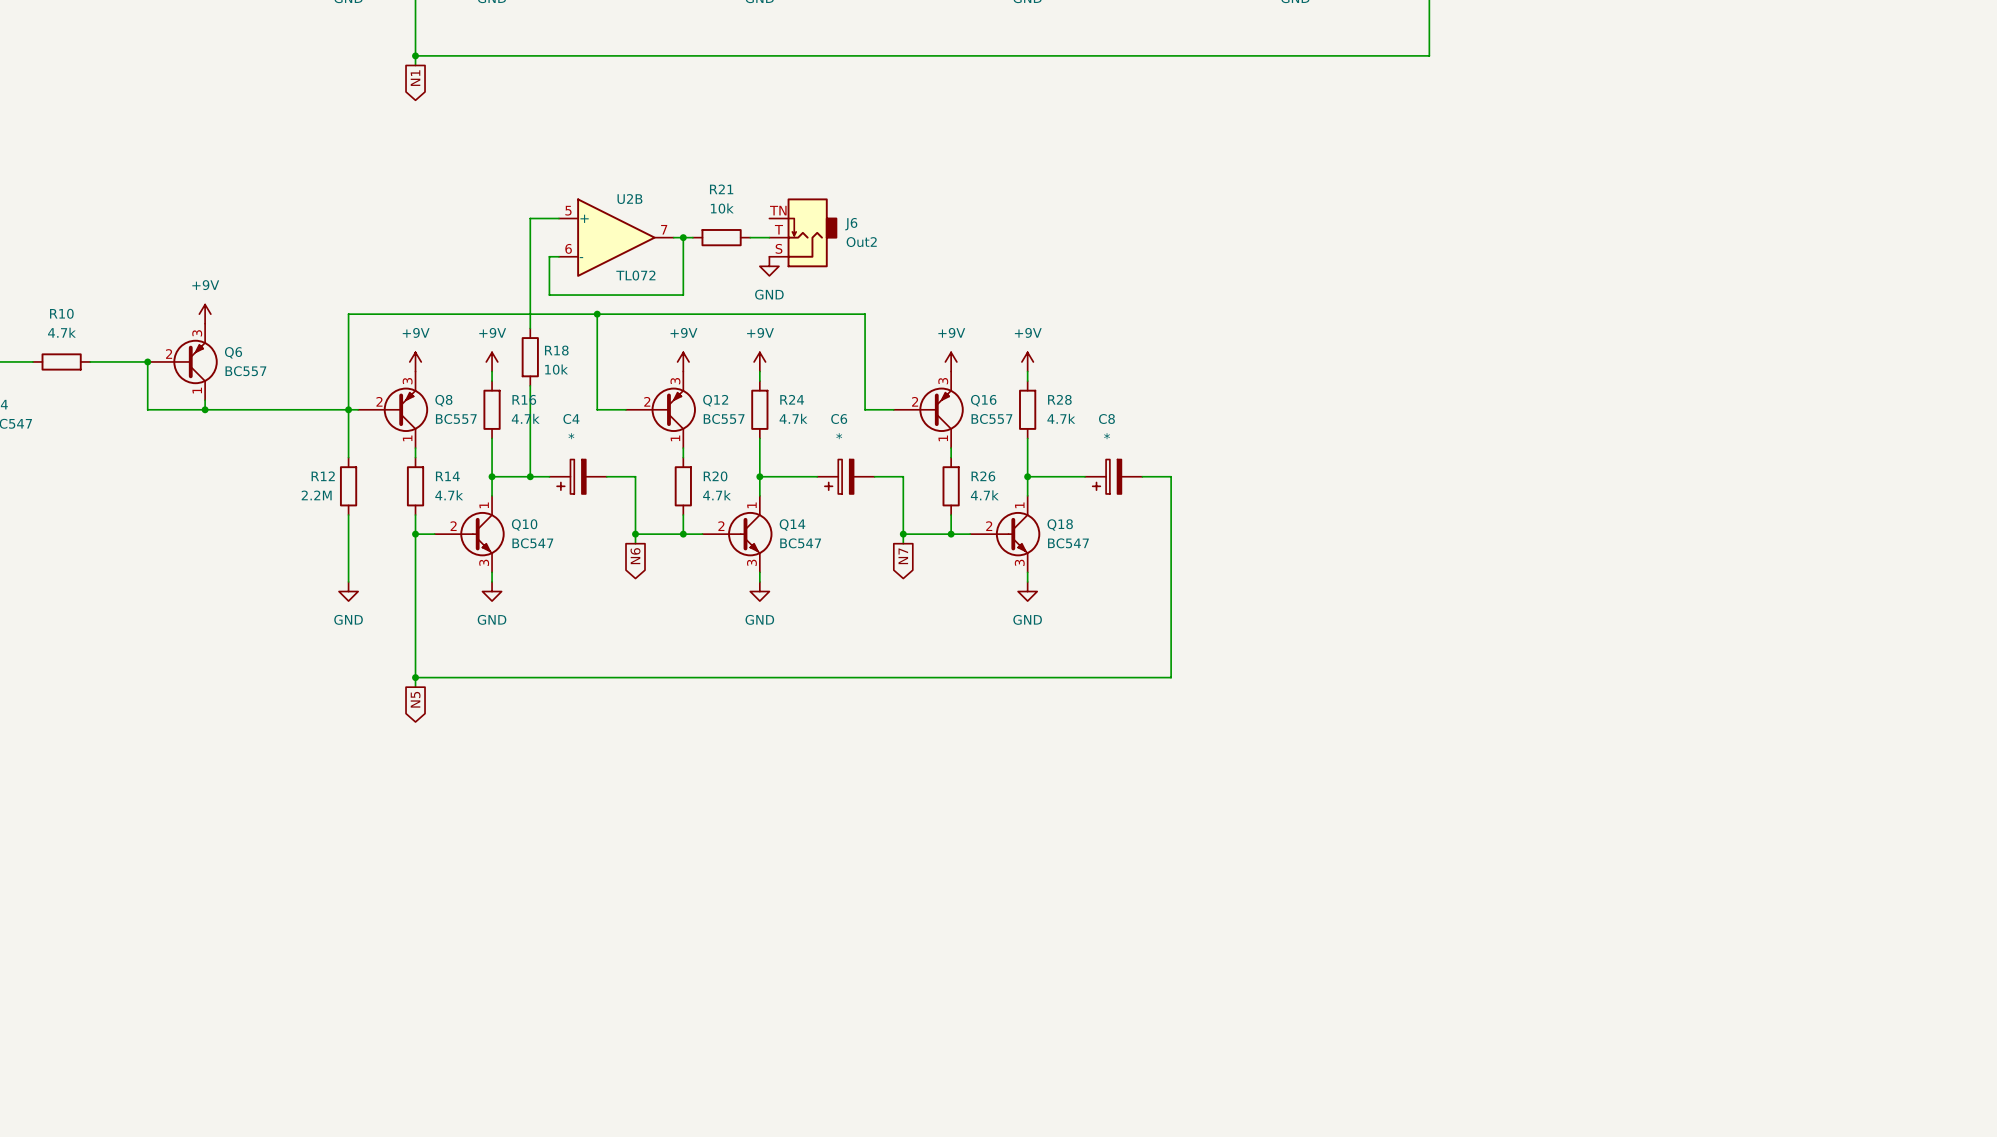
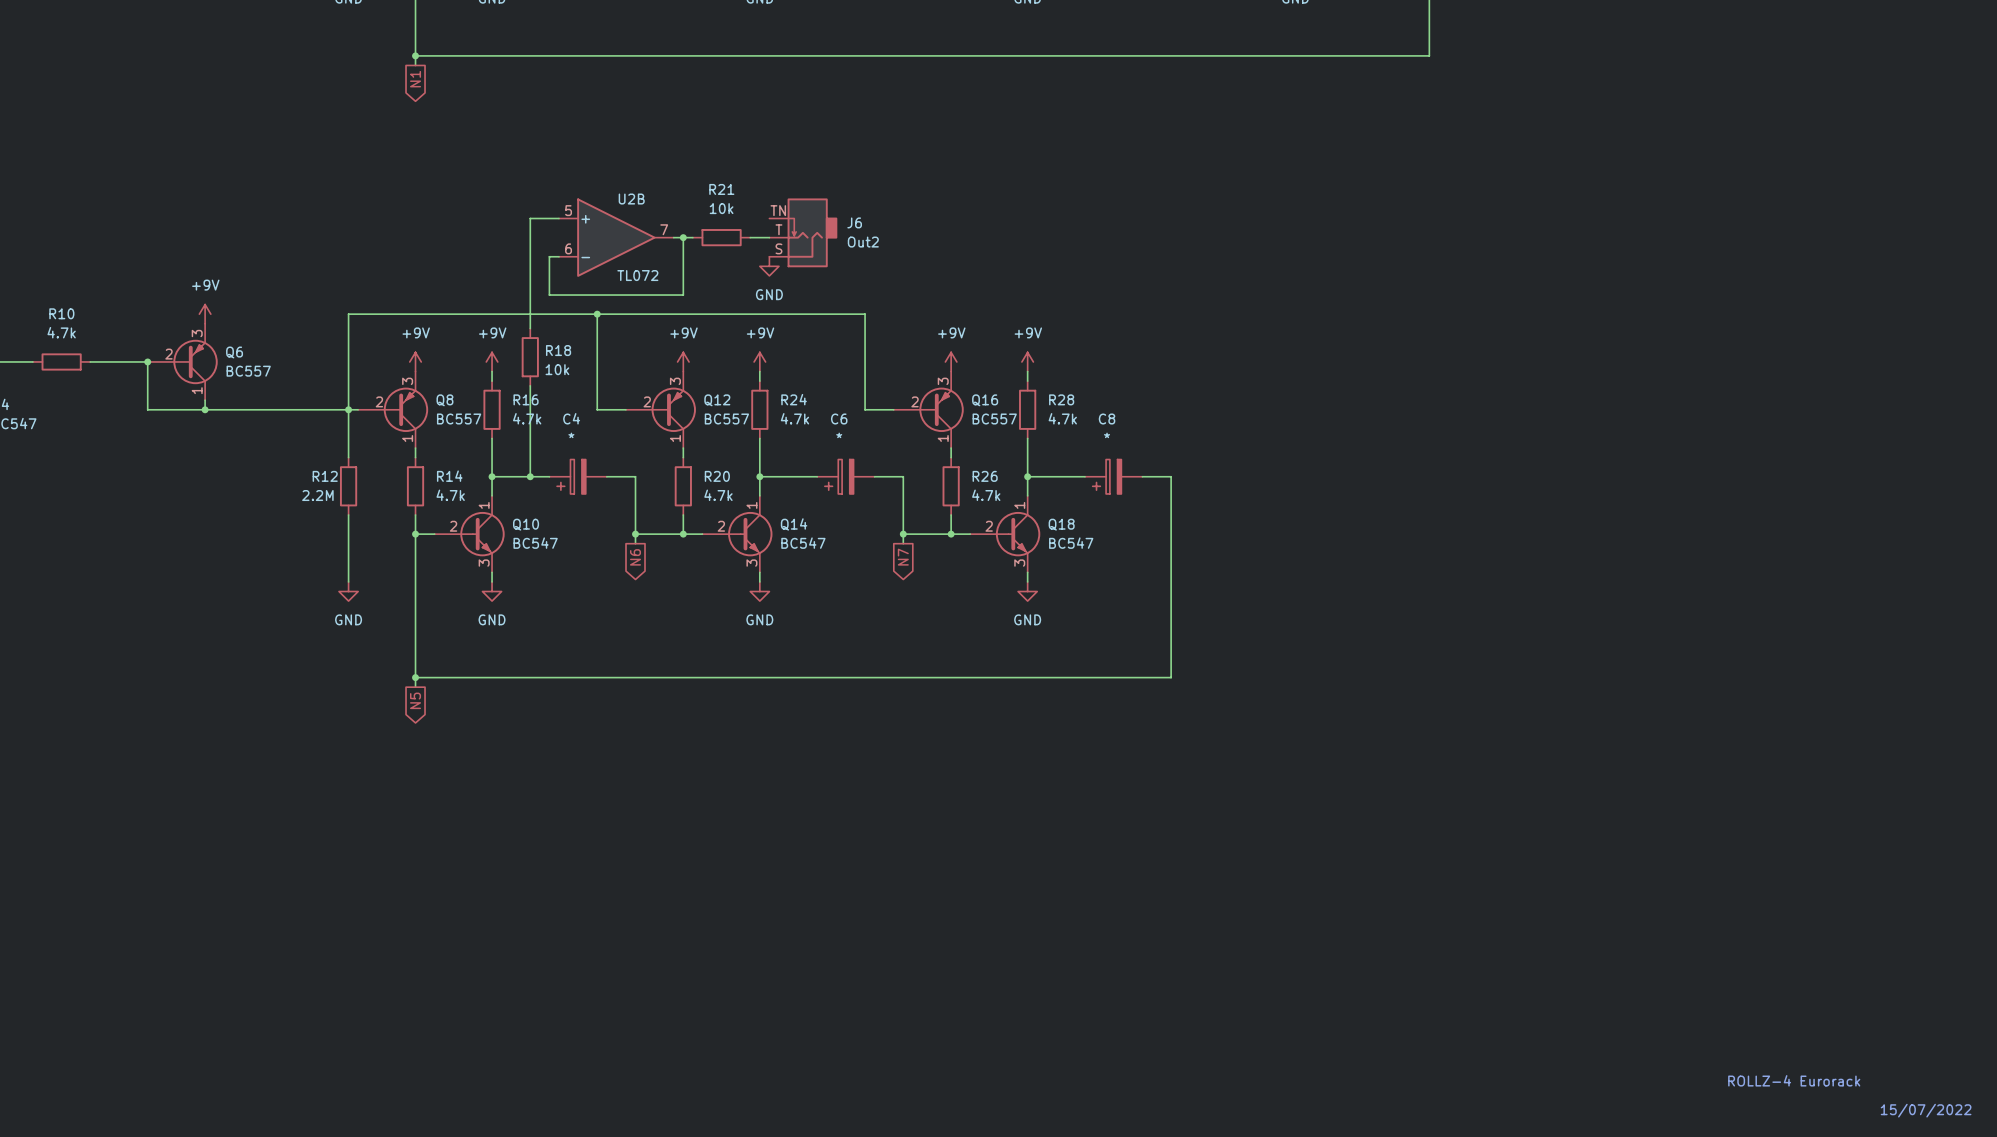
text: none -> ROLLZ-4 Eurorack (1794, 1080)
text: none -> 15/07/2022 (1926, 1110)

